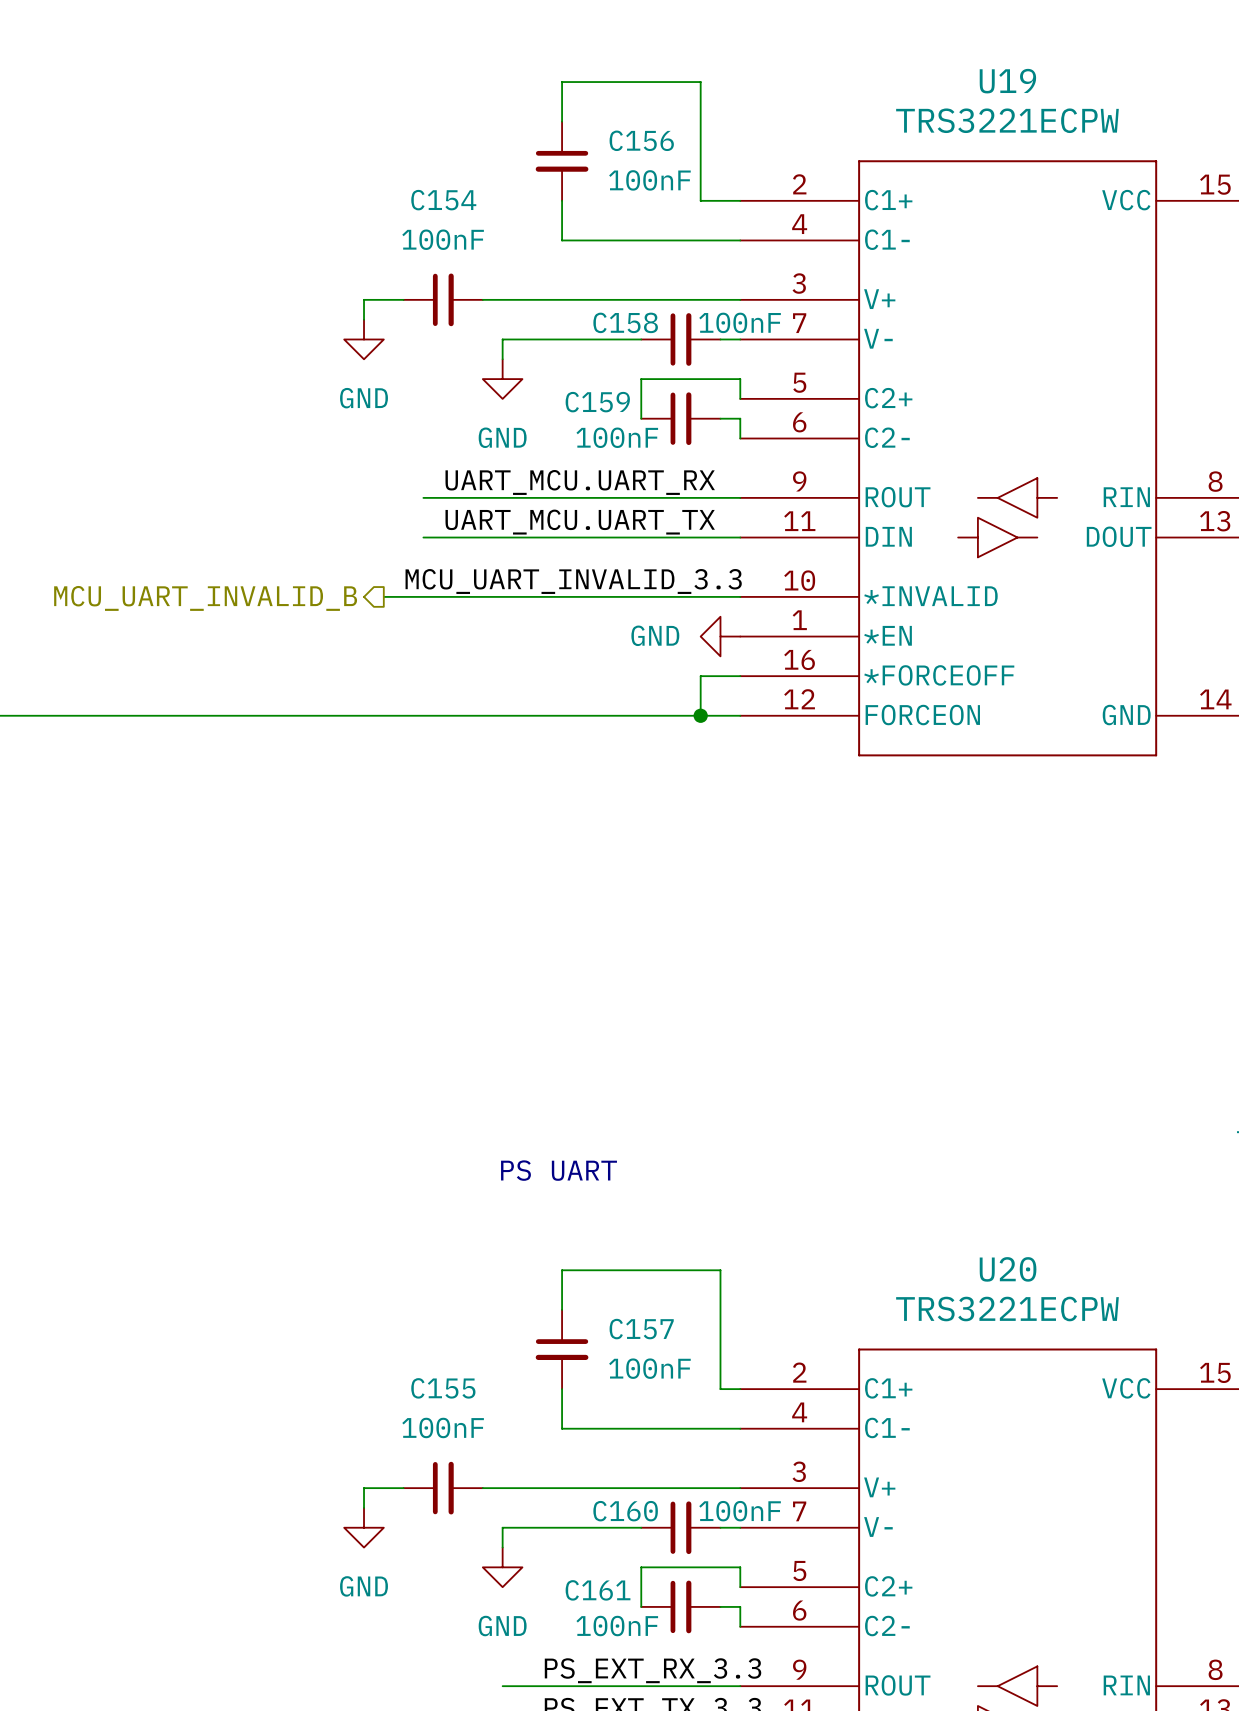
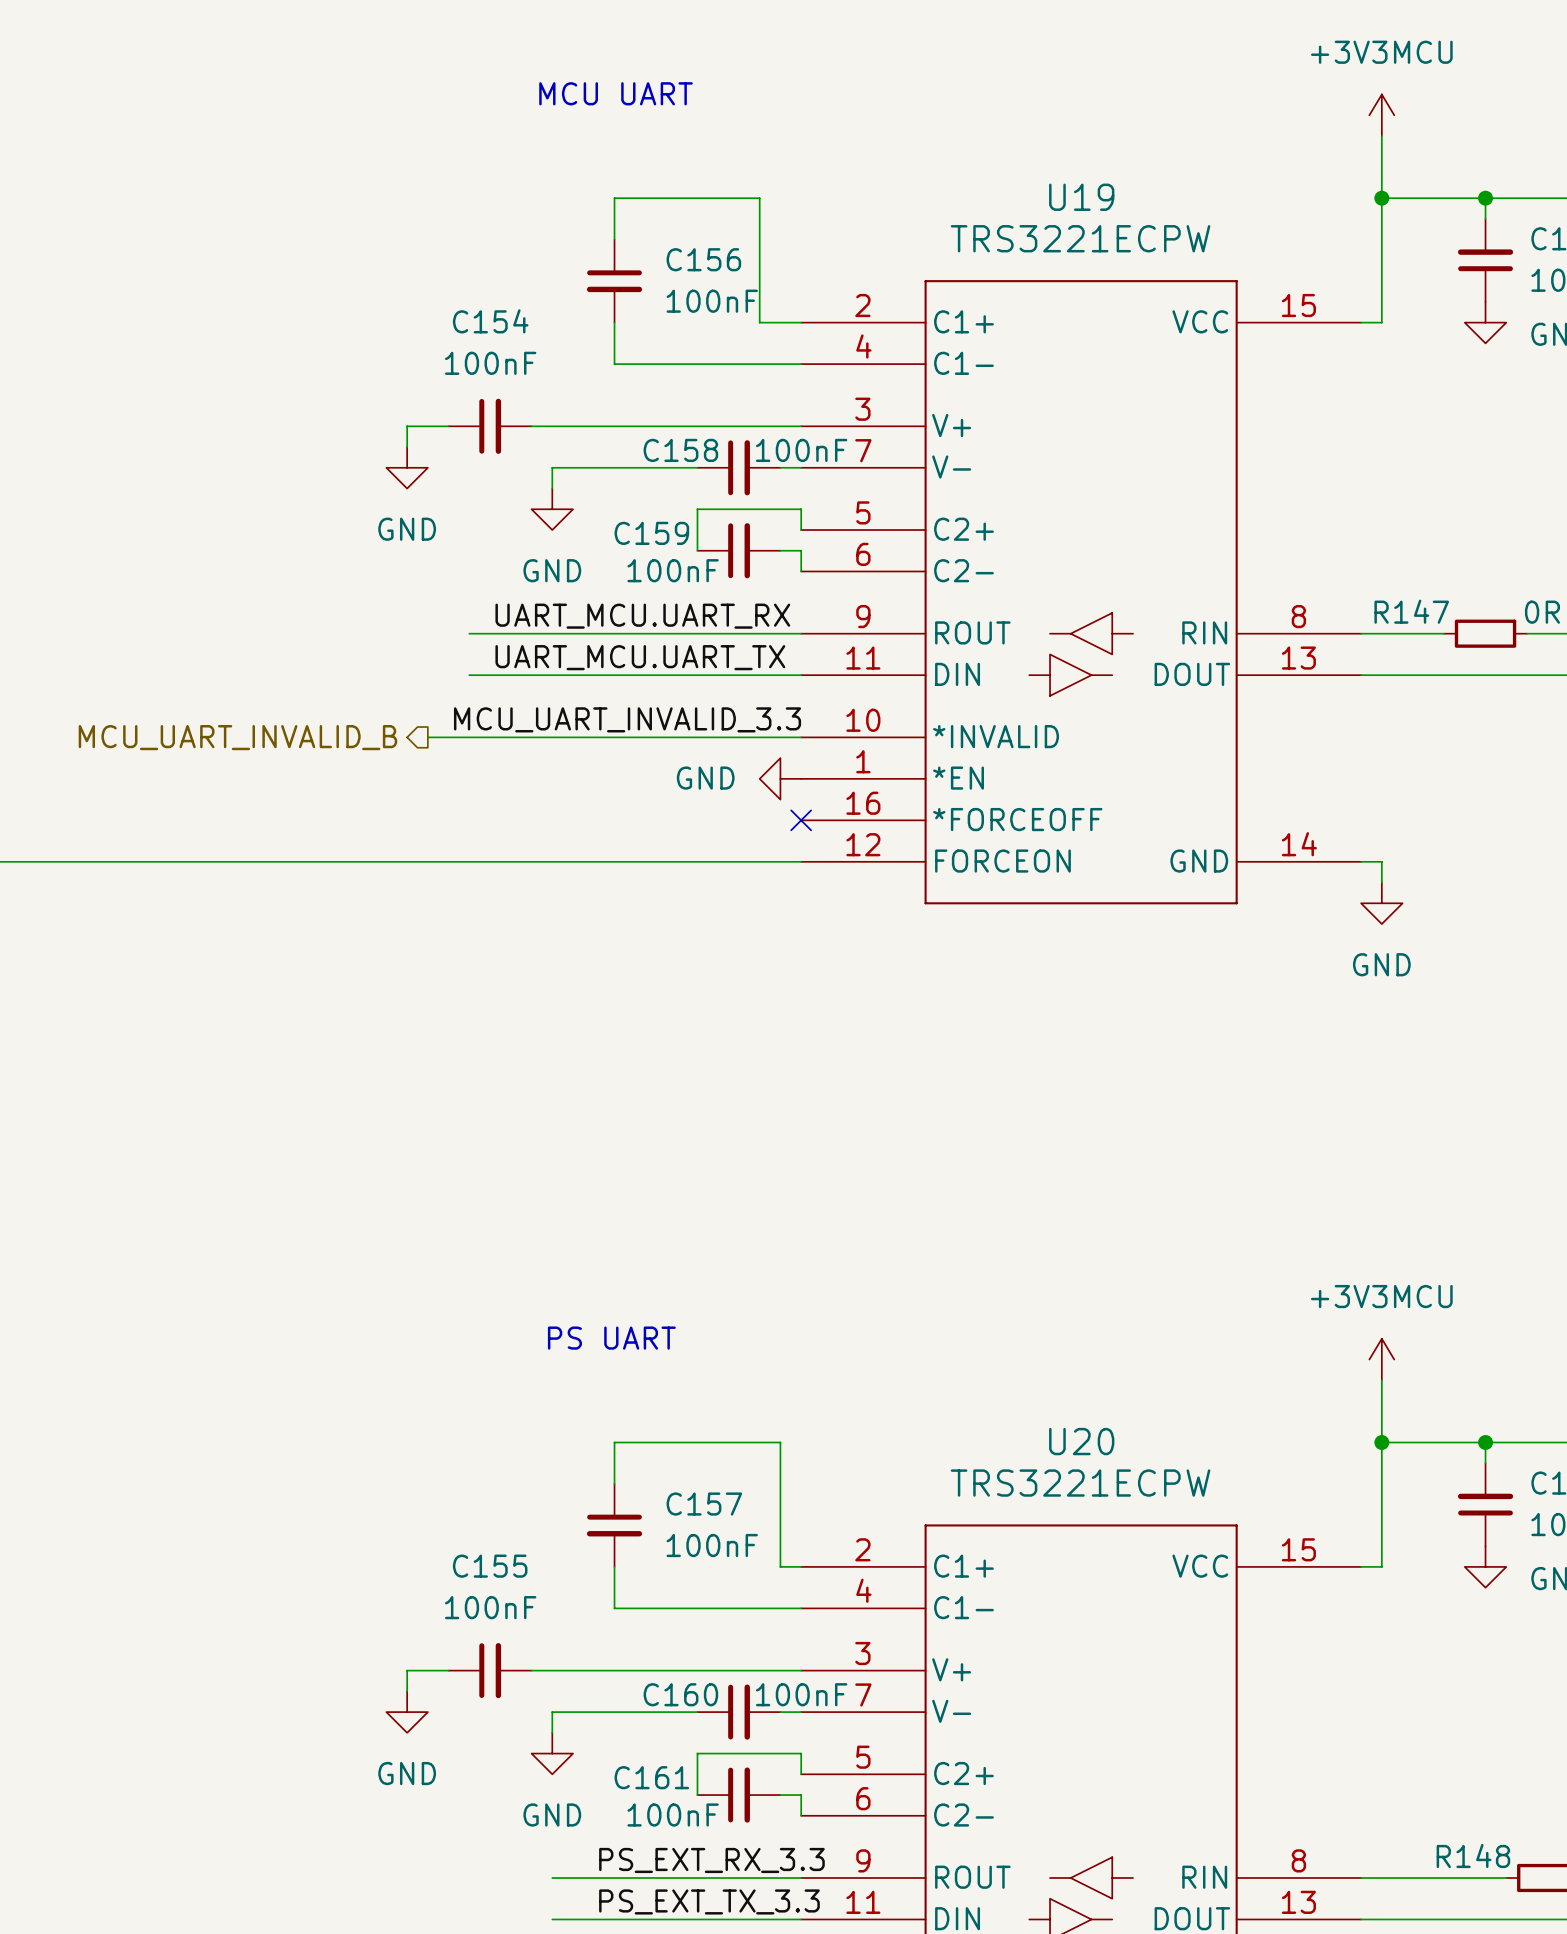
wire: (740, 676) (700, 676) (700, 715) -> none
no-connect mark: none -> (801, 820)
junction: (700, 715) -> none

